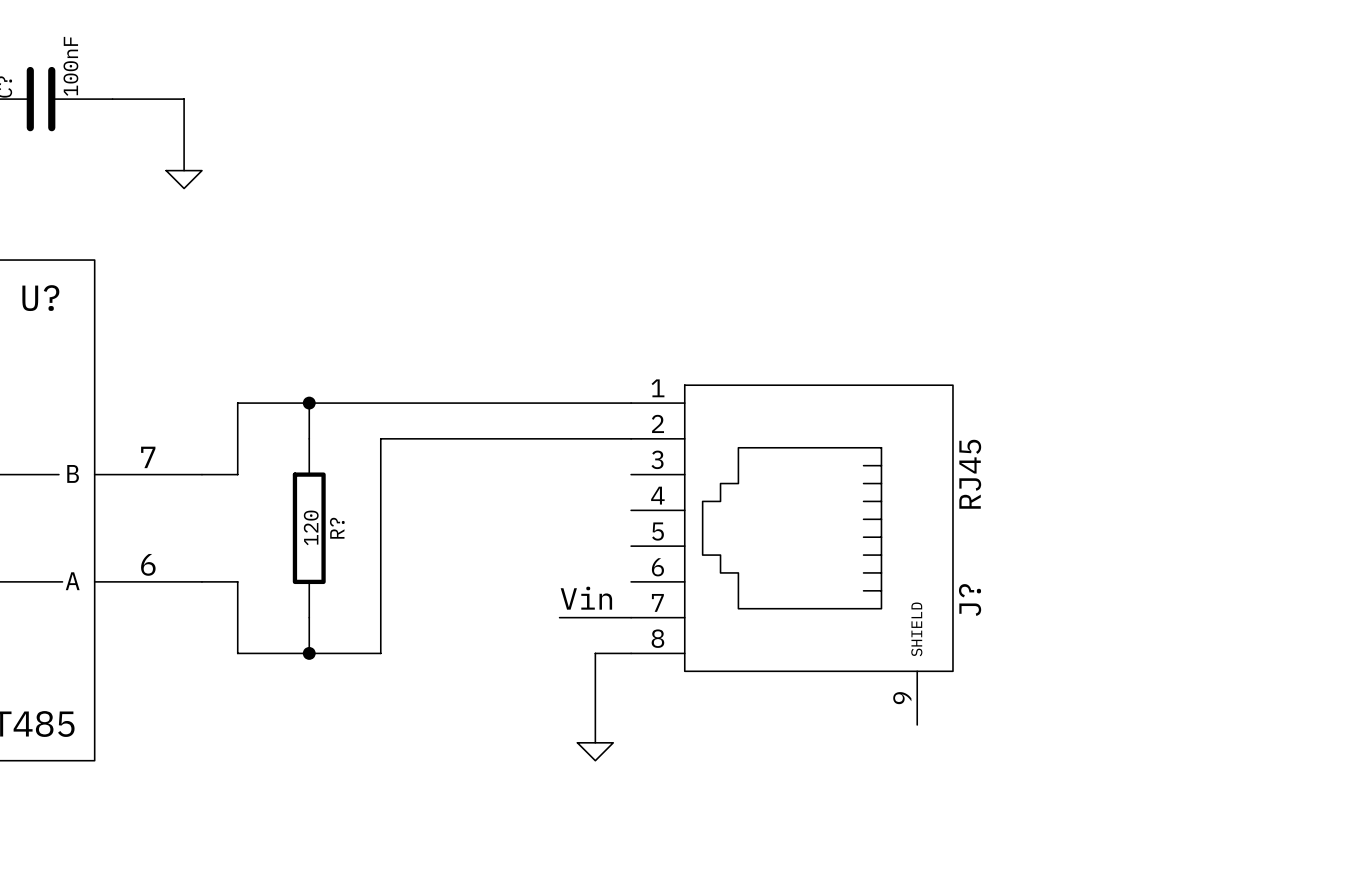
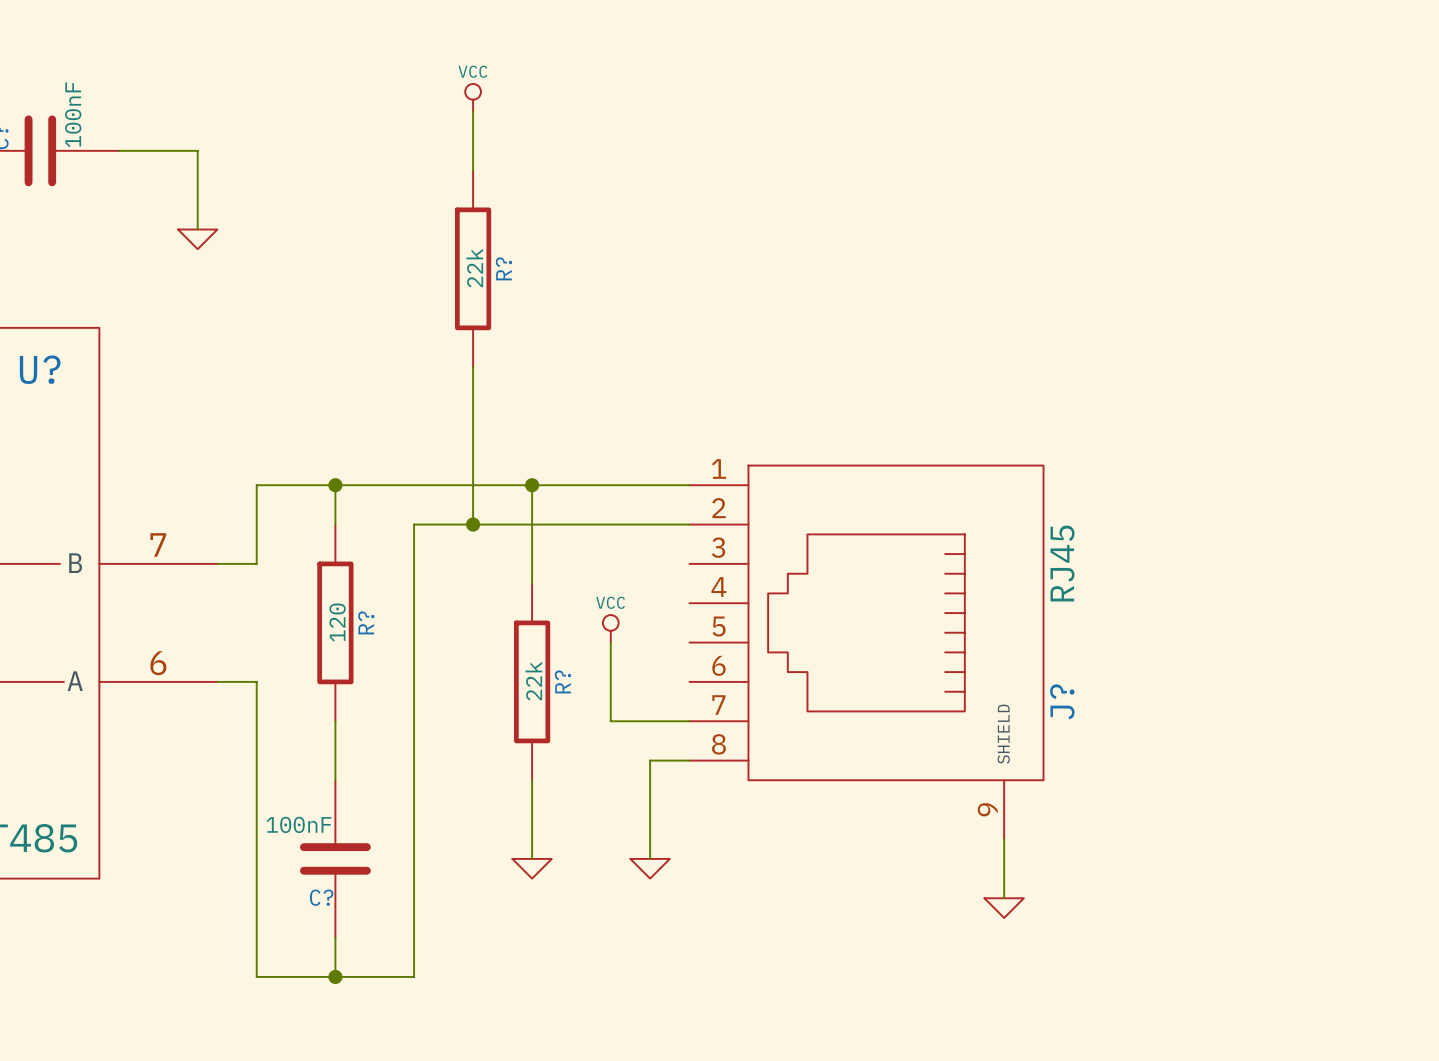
power symbol: none -> VCC (473, 97)
wire: none -> (473, 111) (473, 170)
R?: none -> 22k (473, 268)
wire: none -> (473, 367) (473, 524)
wire: none -> (532, 485) (532, 583)
junction: none -> (532, 485)
junction: none -> (473, 524)
power symbol: none -> VCC (610, 628)
wire: none -> (610, 642) (610, 721)
R?: none -> 22k (532, 681)
label: Vin (586, 598) -> none
wire: (237, 653) (380, 653) -> (256, 760) (256, 976) (414, 976) (414, 760)
wire: none -> (335, 760) (335, 780)
junction: (309, 653) -> none
wire: none -> (532, 780) (532, 858)
wire: none -> (1004, 839) (1004, 898)
C?: none -> 100nF (335, 858)
power symbol: none -> (532, 868)
power symbol: none -> (1004, 908)
wire: none -> (335, 937) (335, 976)
junction: none -> (335, 976)

